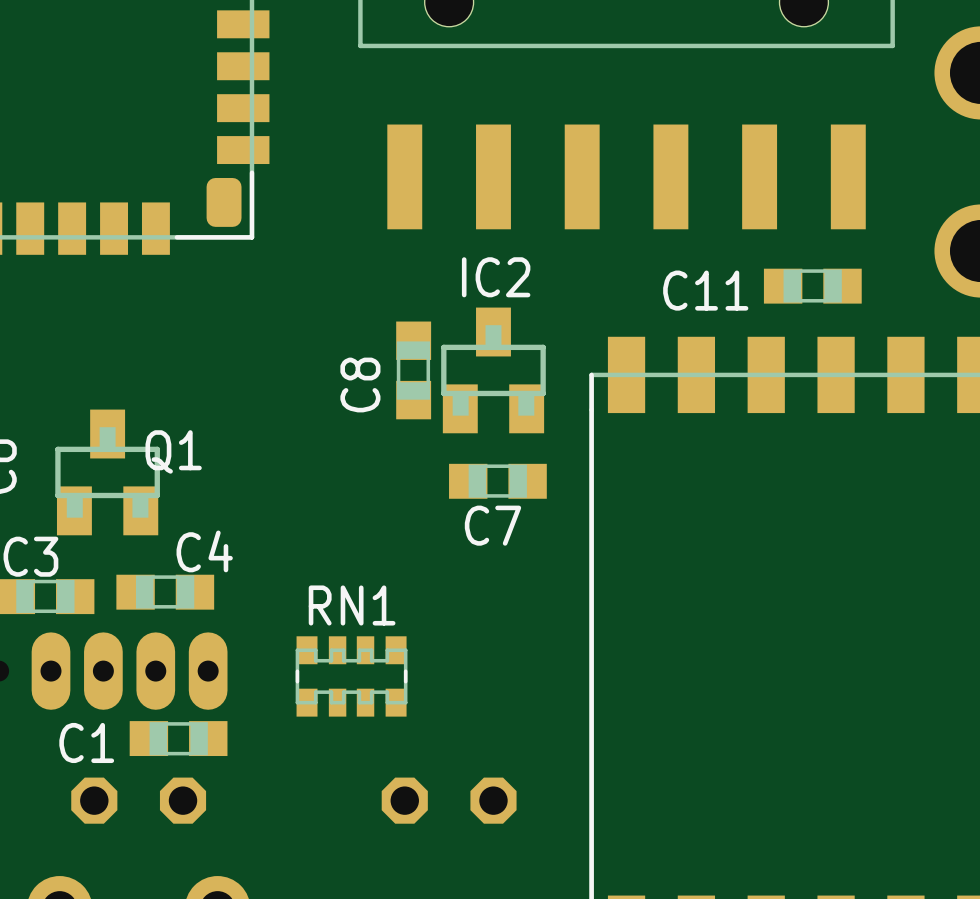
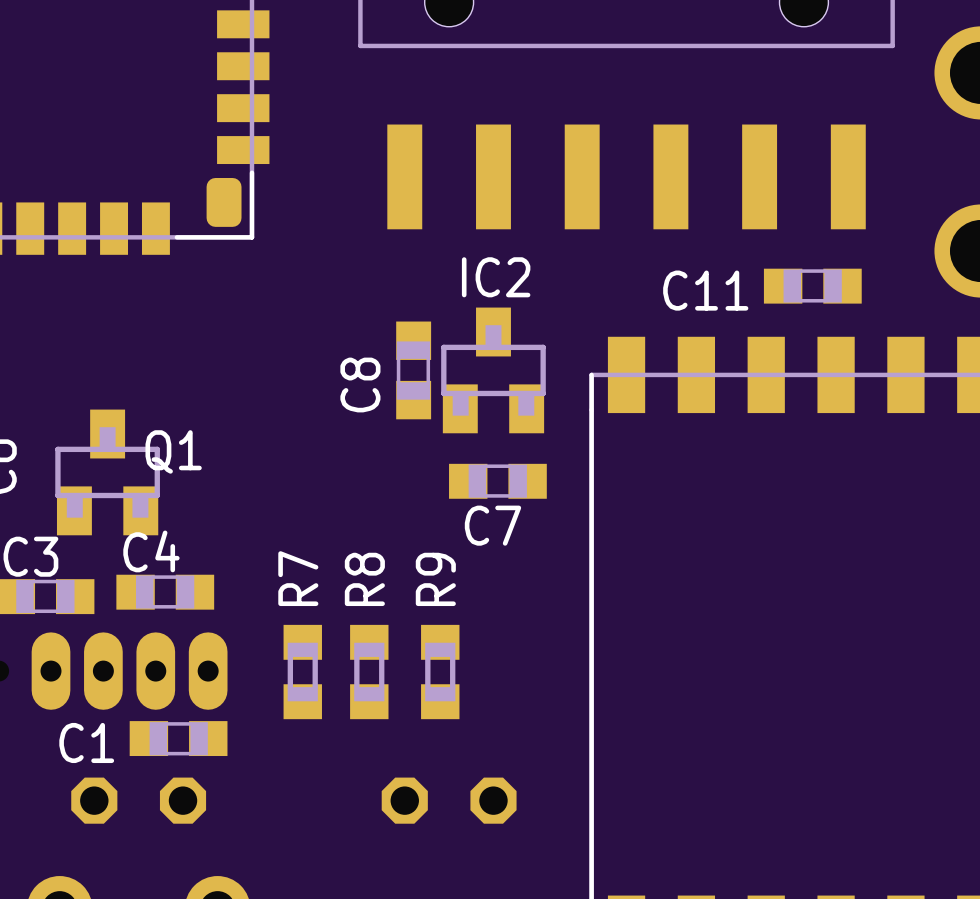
C4 name position: C4 (204, 551) -> C4 (151, 551)
R7: none -> (302, 672)
R8: none -> (369, 672)
R9: none -> (440, 672)
RN1: (351, 676) -> none

